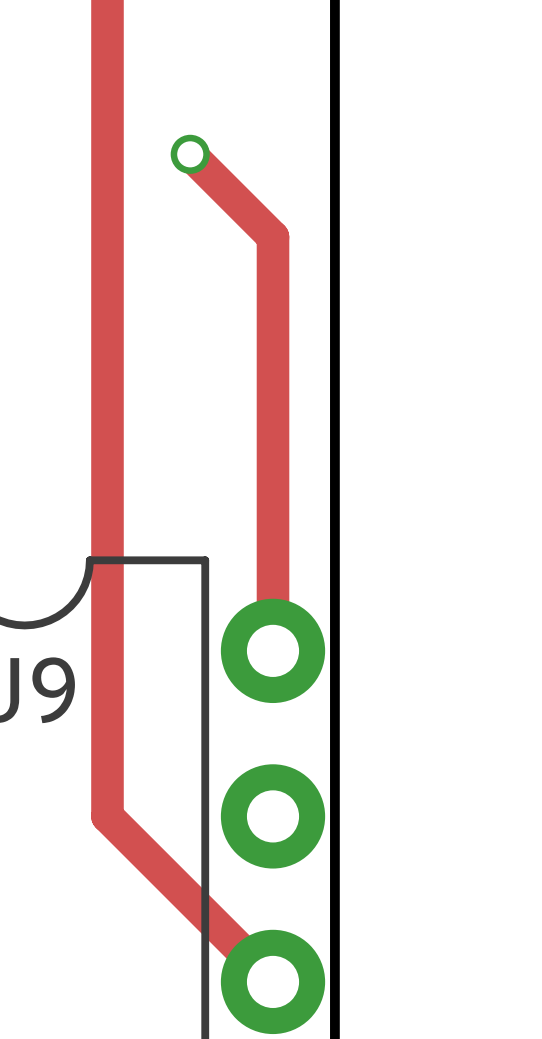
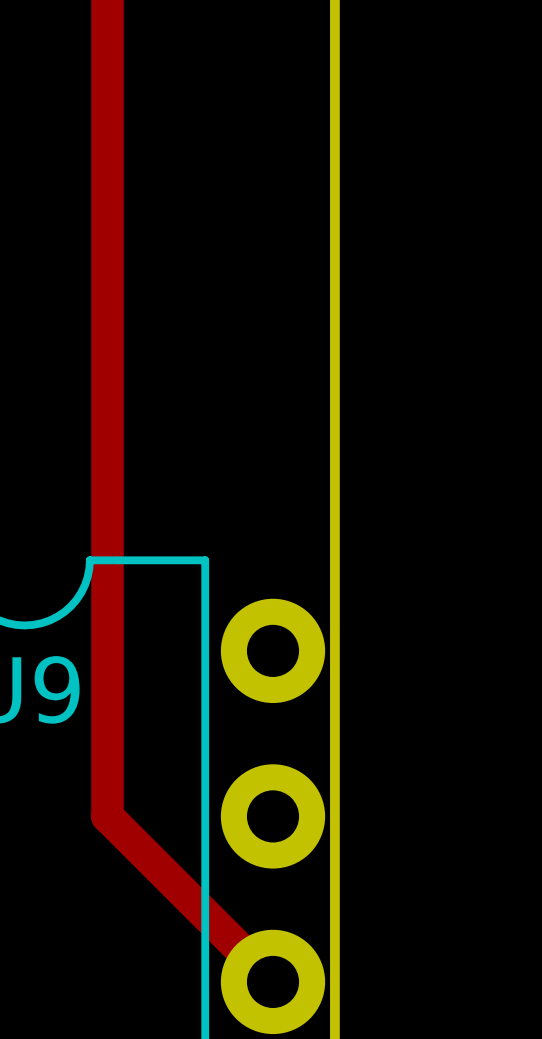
track: (190, 154) (273, 237) (273, 650) -> none
via: (190, 154) -> none

